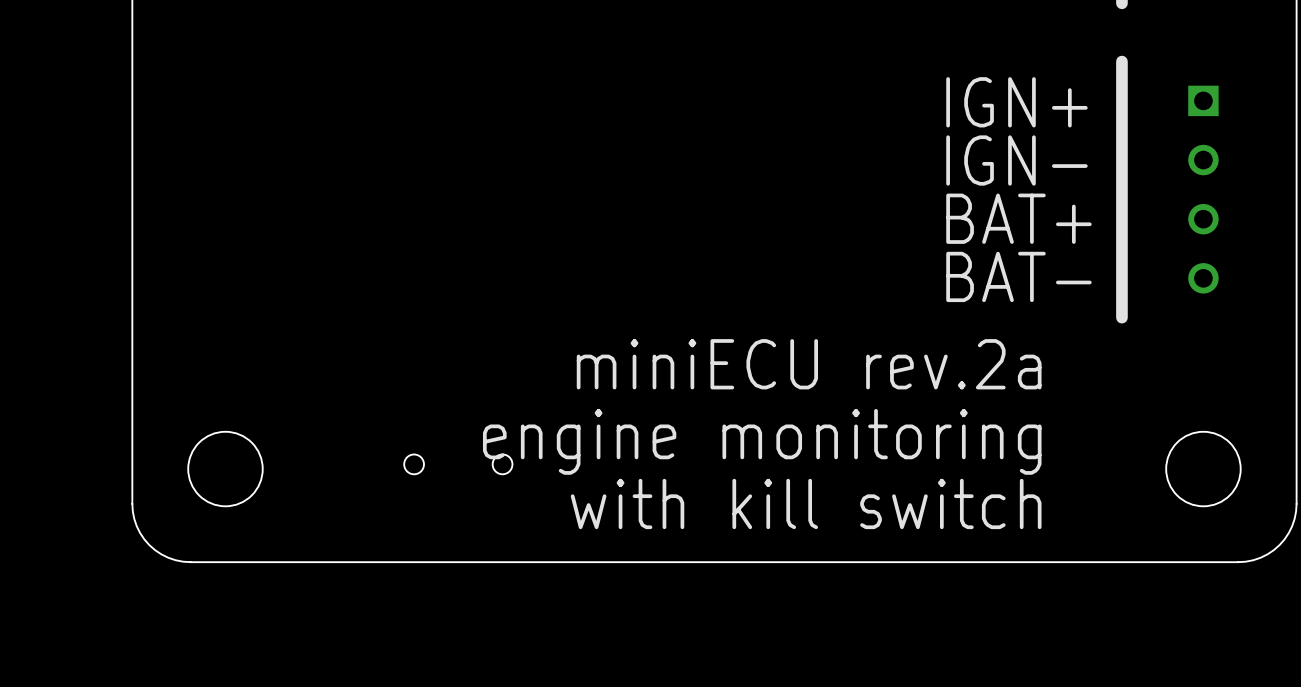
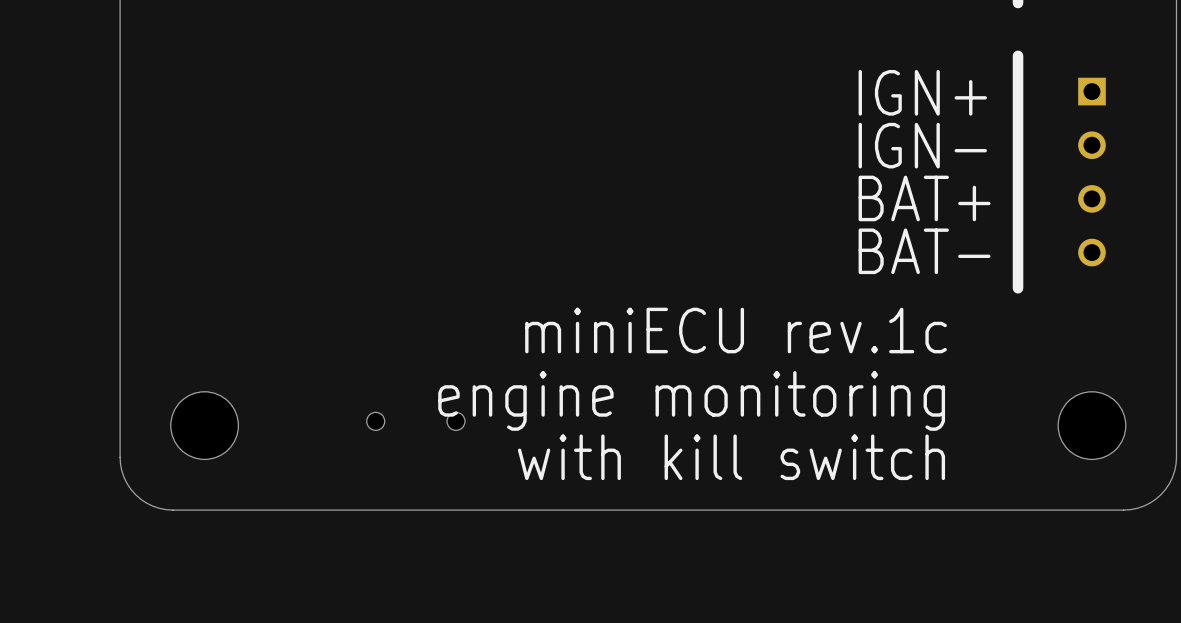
text: miniECU rev.2a (809, 364) -> miniECU rev.1c (736, 330)

